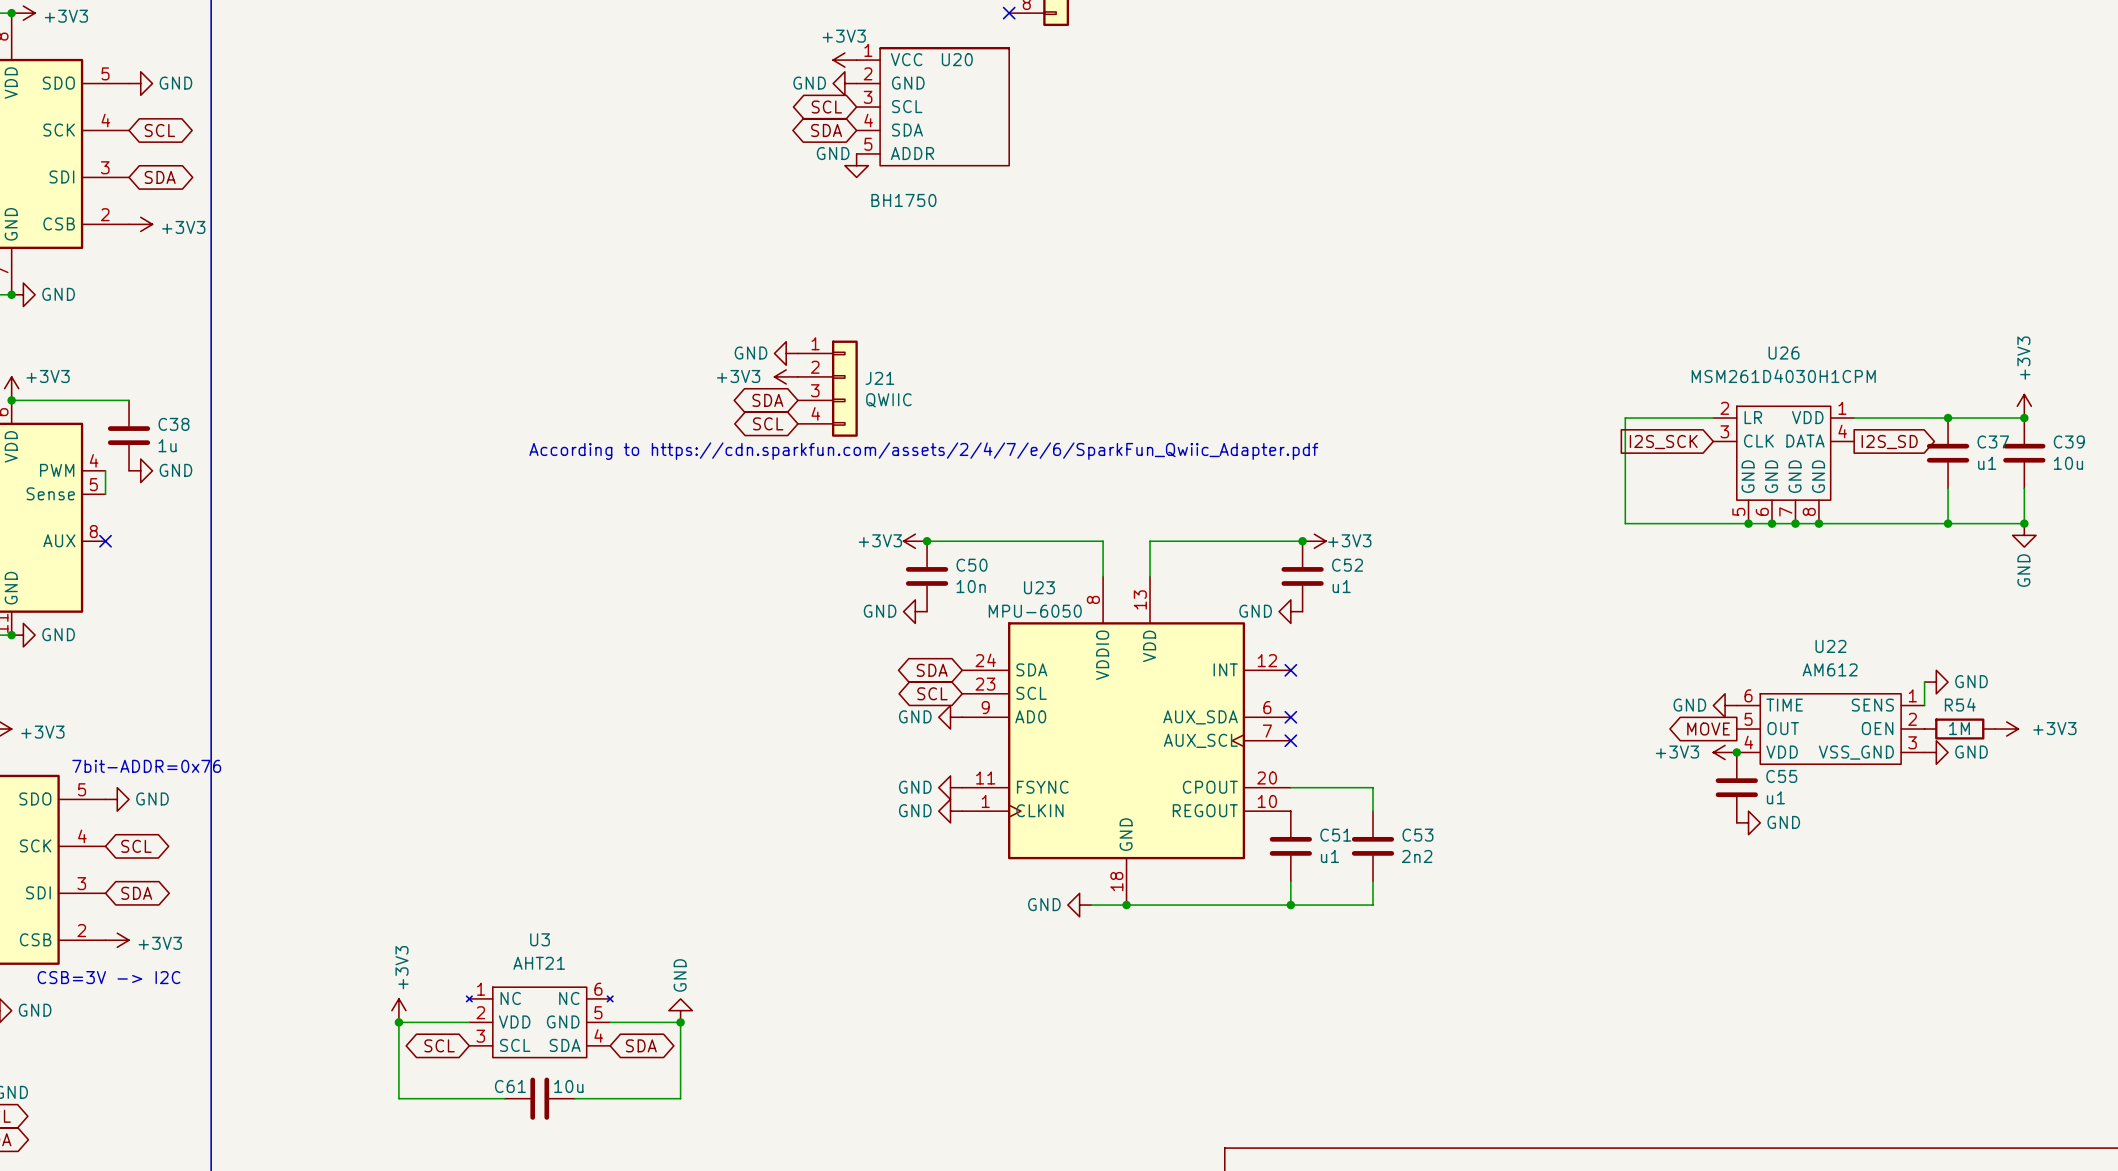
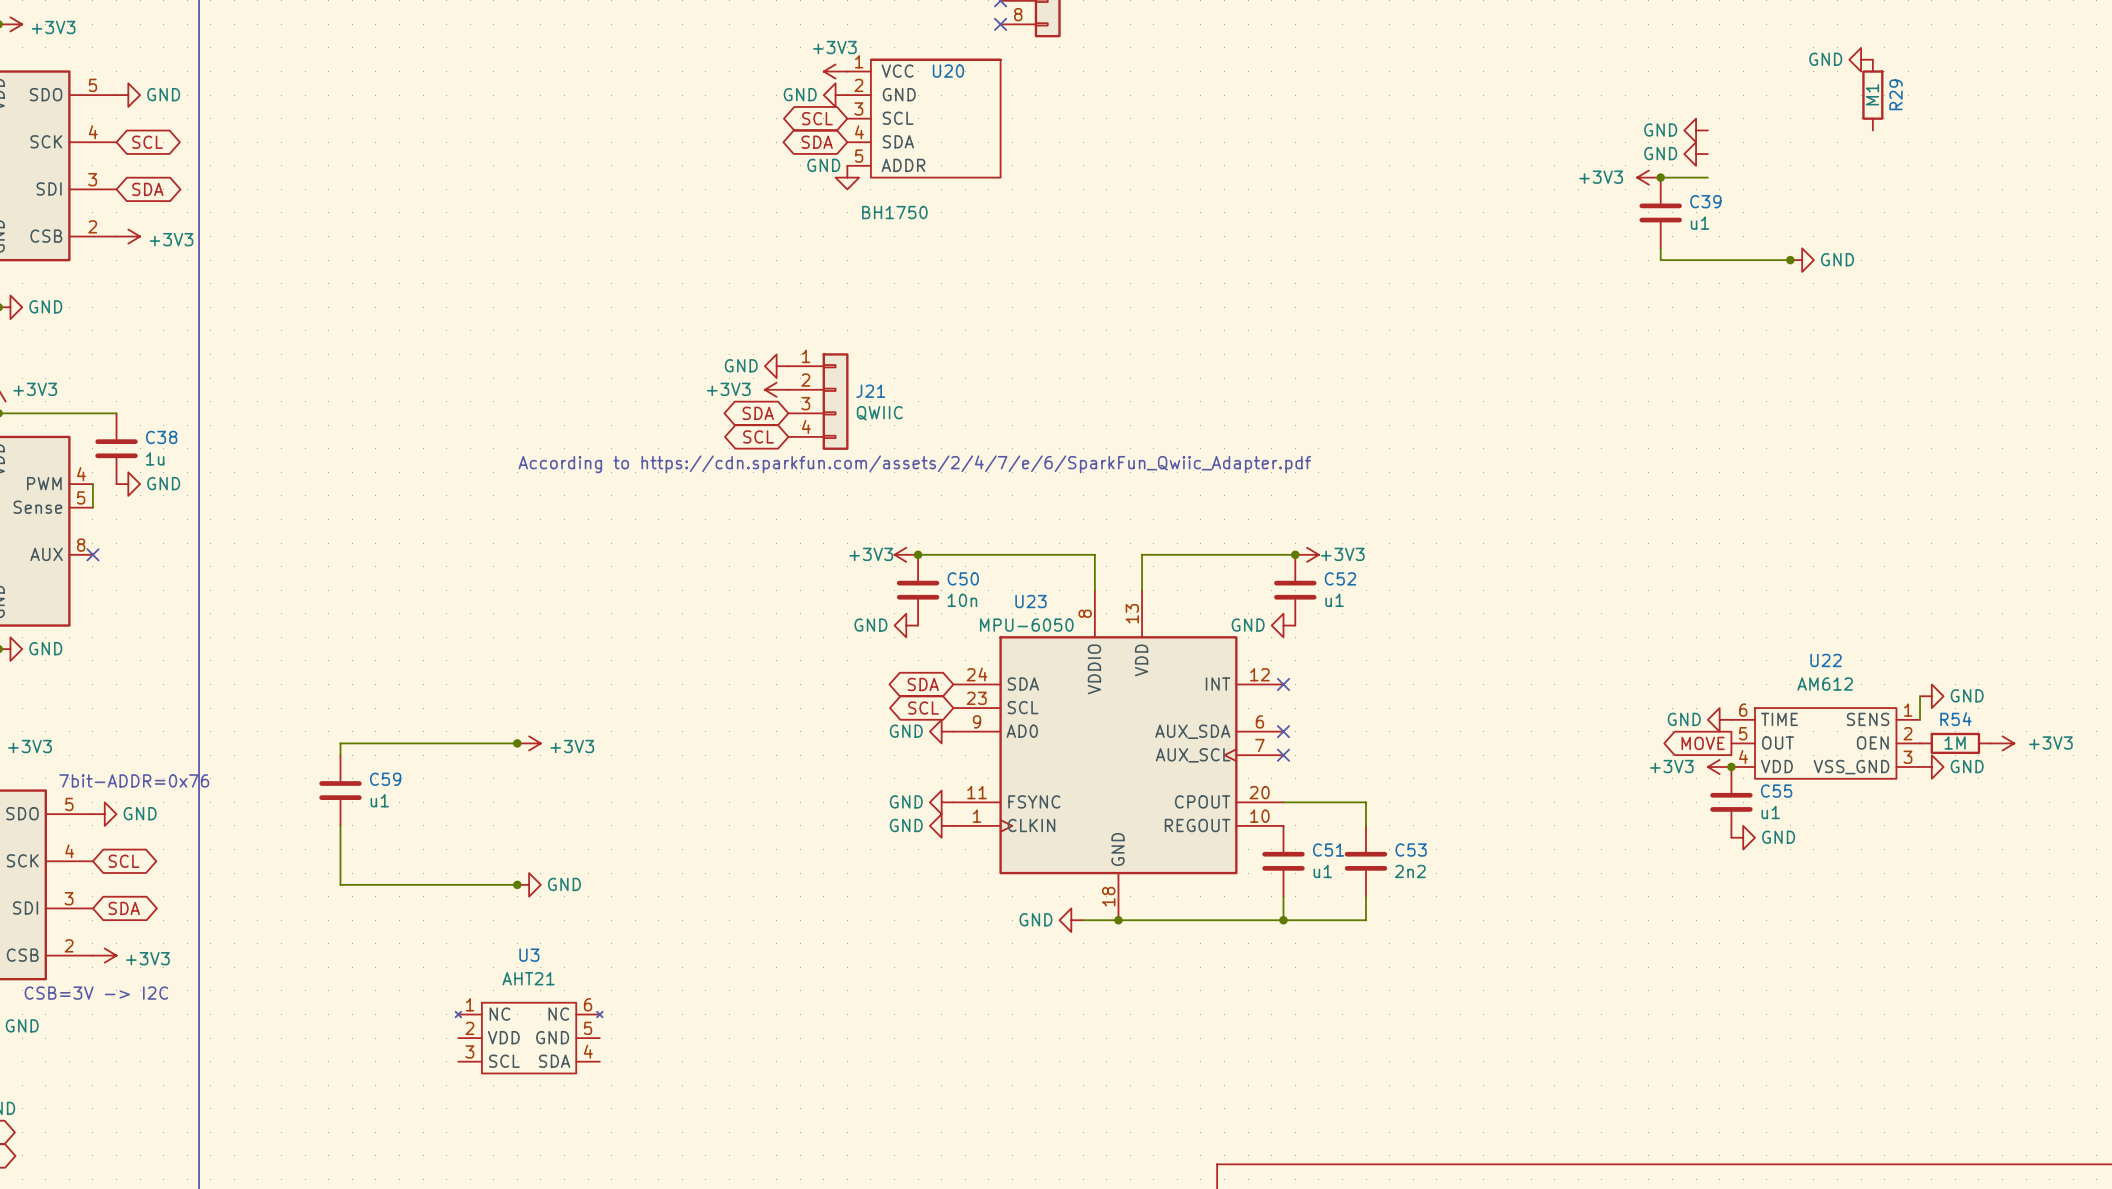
power symbol: none -> GND (1861, 59)
R29: none -> M1 (1872, 95)
power symbol: none -> GND (1696, 130)
power symbol: none -> GND (1696, 154)
power symbol: none -> +3V3 (1648, 177)
wire: none -> (1660, 177) (1707, 177)
junction: none -> (1660, 177)
wire: none -> (1660, 248) (1660, 260) (1790, 260)
junction: none -> (1790, 260)
power symbol: none -> GND (1802, 260)
power symbol: +3V3 (2024, 406) -> none
wire: (1713, 418) (1625, 418) (1625, 523) (2024, 523) (2024, 488) -> none
wire: (1854, 418) (2024, 418) -> none
junction: (1948, 418) -> none
junction: (2024, 418) -> none
global label: I2S_SCK (1663, 442) -> none
global label: I2S_SD (1889, 442) -> none
C37: u1 (1948, 453) -> none
C39 position: (2024, 453) -> (1660, 212)
C39 value: 10u (2068, 463) -> u1 (1699, 223)
U26: MSM261D4030H1CPM (1783, 464) -> none
wire: (1948, 488) (1948, 523) -> none
junction: (1748, 523) -> none
junction: (1772, 523) -> none
junction: (1795, 523) -> none
junction: (1818, 523) -> none
junction: (1948, 523) -> none
junction: (2024, 523) -> none
power symbol: GND (2024, 535) -> none
wire: none -> (517, 743) (340, 743) (340, 755)
junction: none -> (517, 743)
power symbol: none -> +3V3 (529, 743)
C59: none -> u1 (340, 790)
wire: none -> (340, 825) (340, 884) (517, 884)
junction: none -> (517, 884)
power symbol: +3V3 (398, 1010) -> none
power symbol rotation: 0° (680, 1010) -> 90° clockwise (529, 884)
power symbol position: GND (680, 1010) -> GND (529, 884)
junction: (398, 1022) -> none
wire: (469, 1022) (398, 1022) (398, 1098) (504, 1098) -> none
wire: (610, 1022) (680, 1022) (680, 1098) (574, 1098) -> none
junction: (680, 1022) -> none
global label: SCL (439, 1045) -> none
global label: SDA (641, 1045) -> none
C61: 10u (539, 1098) -> none

